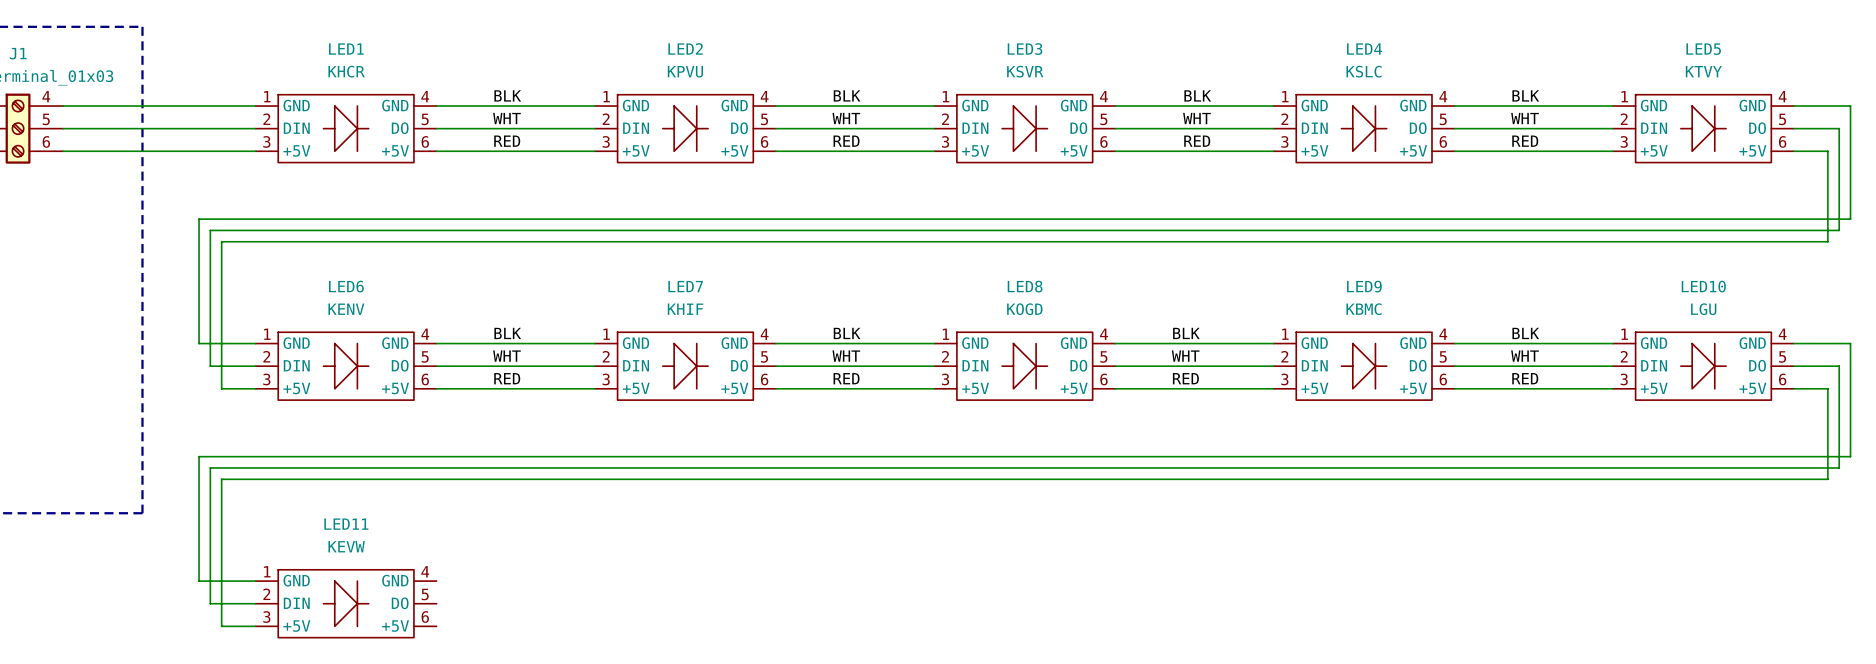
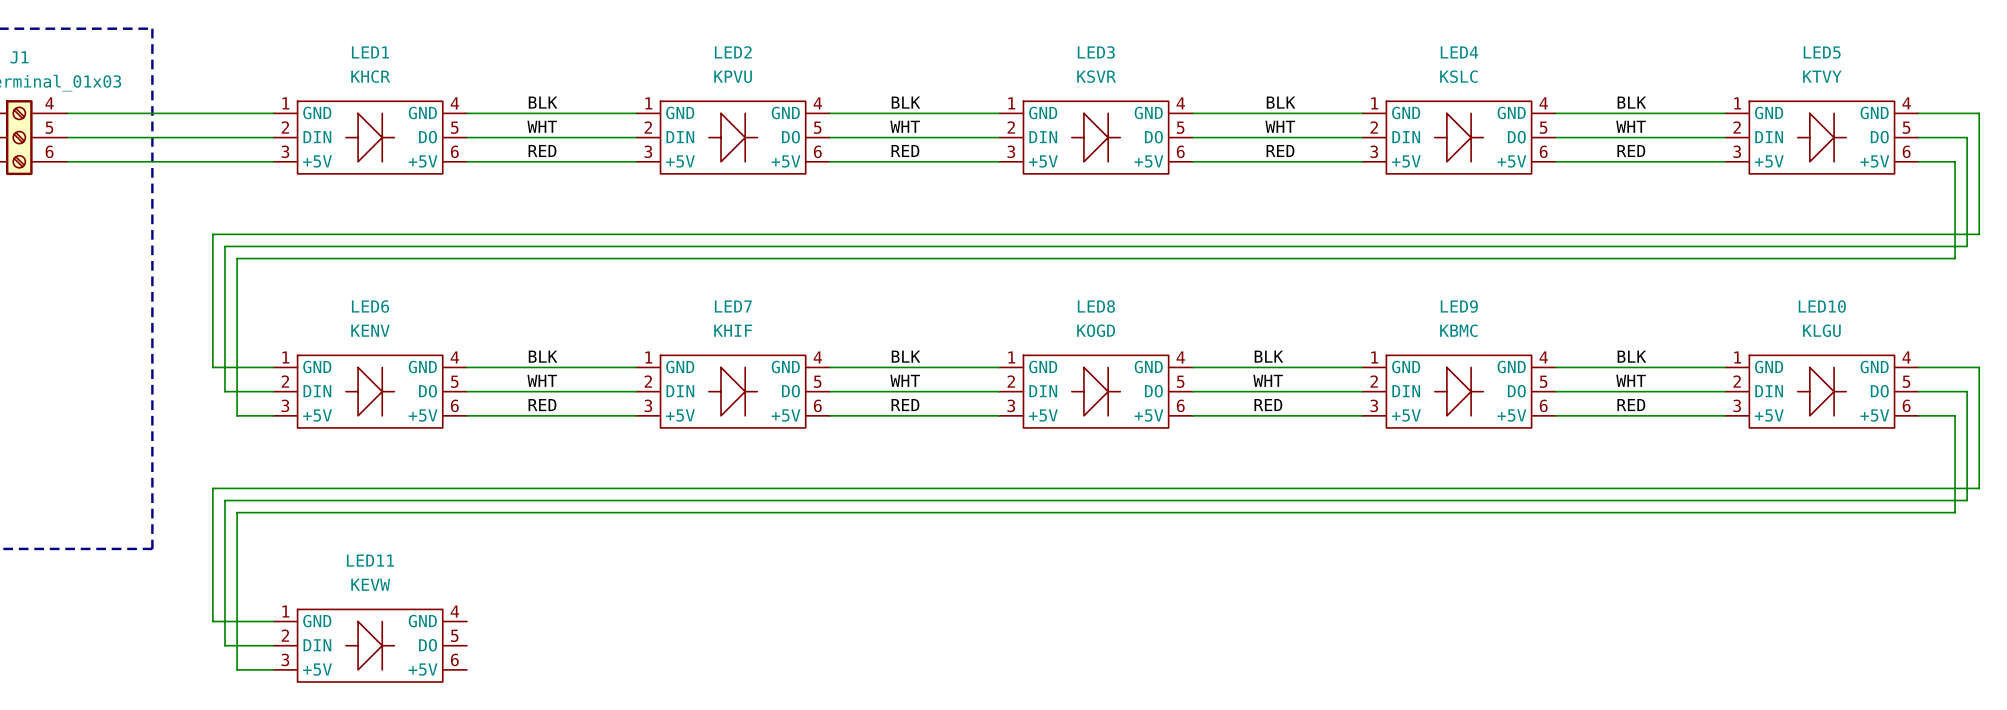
LED10 value: LGU (1703, 309) -> KLGU (1821, 330)

